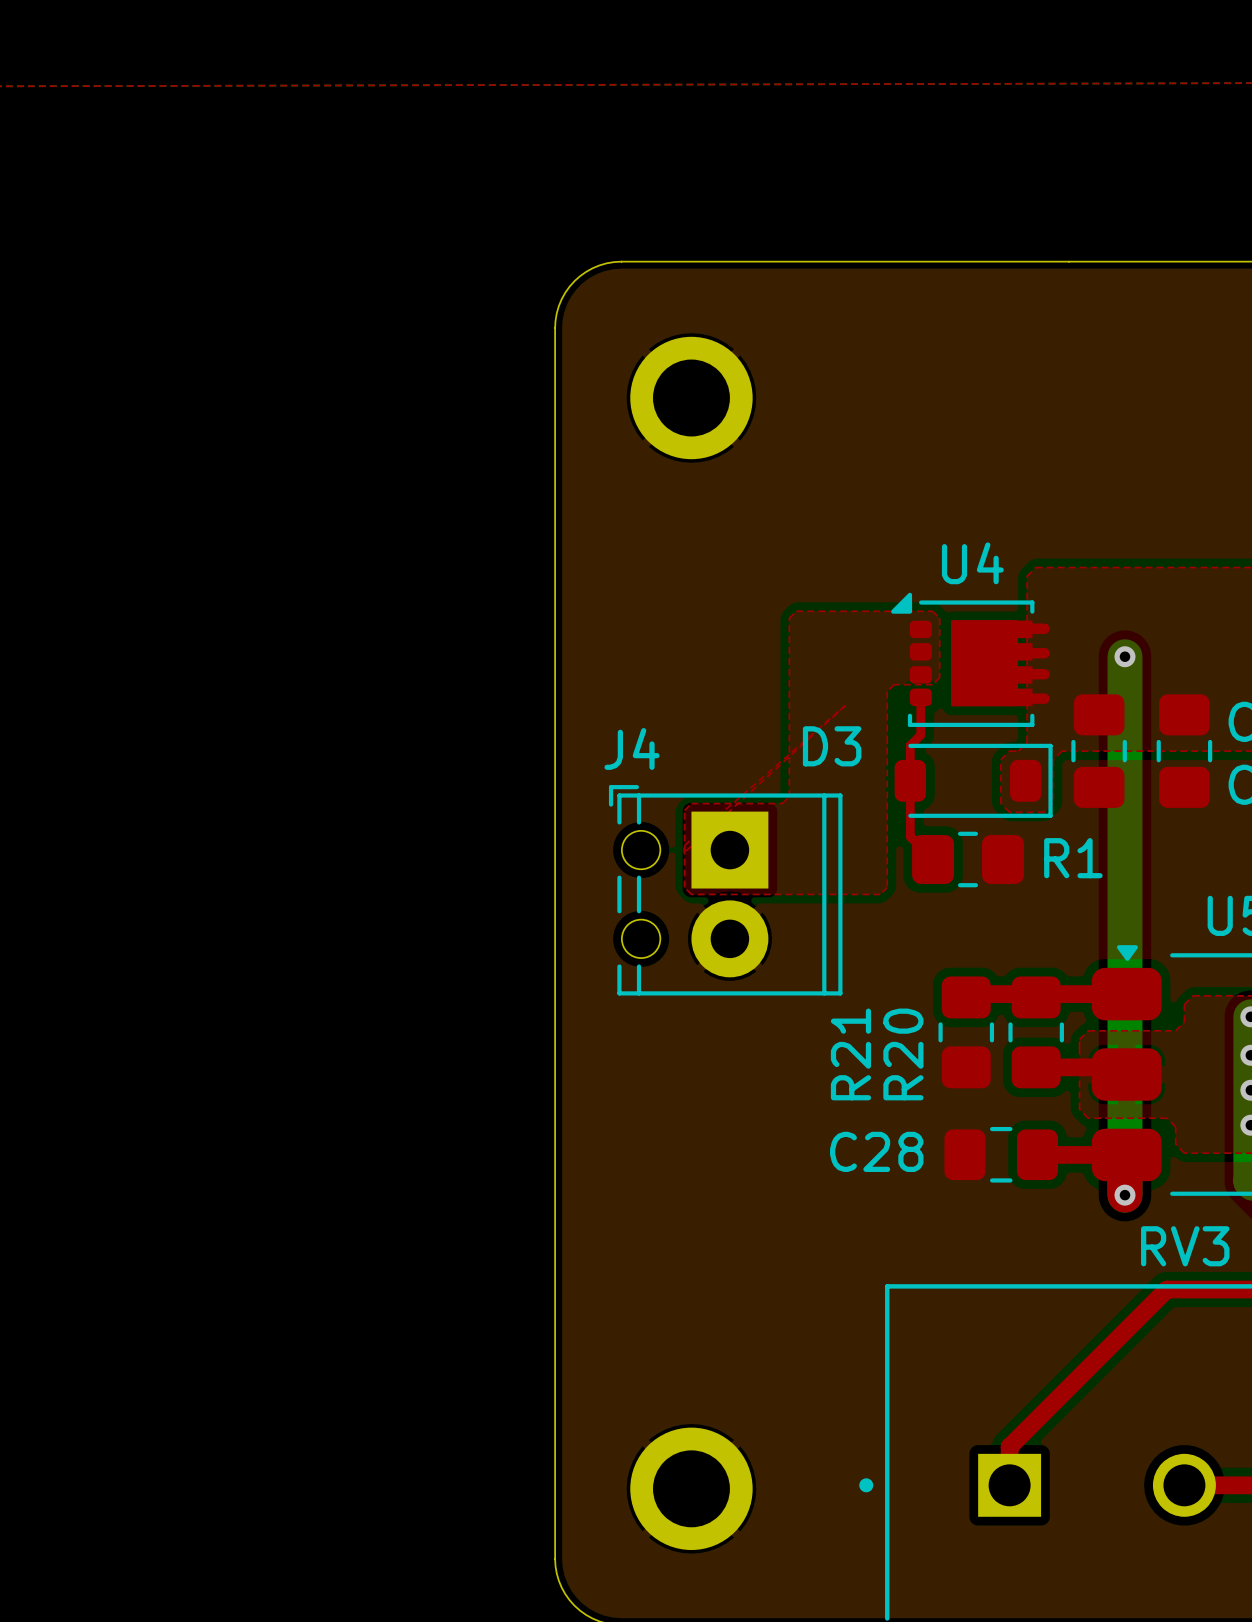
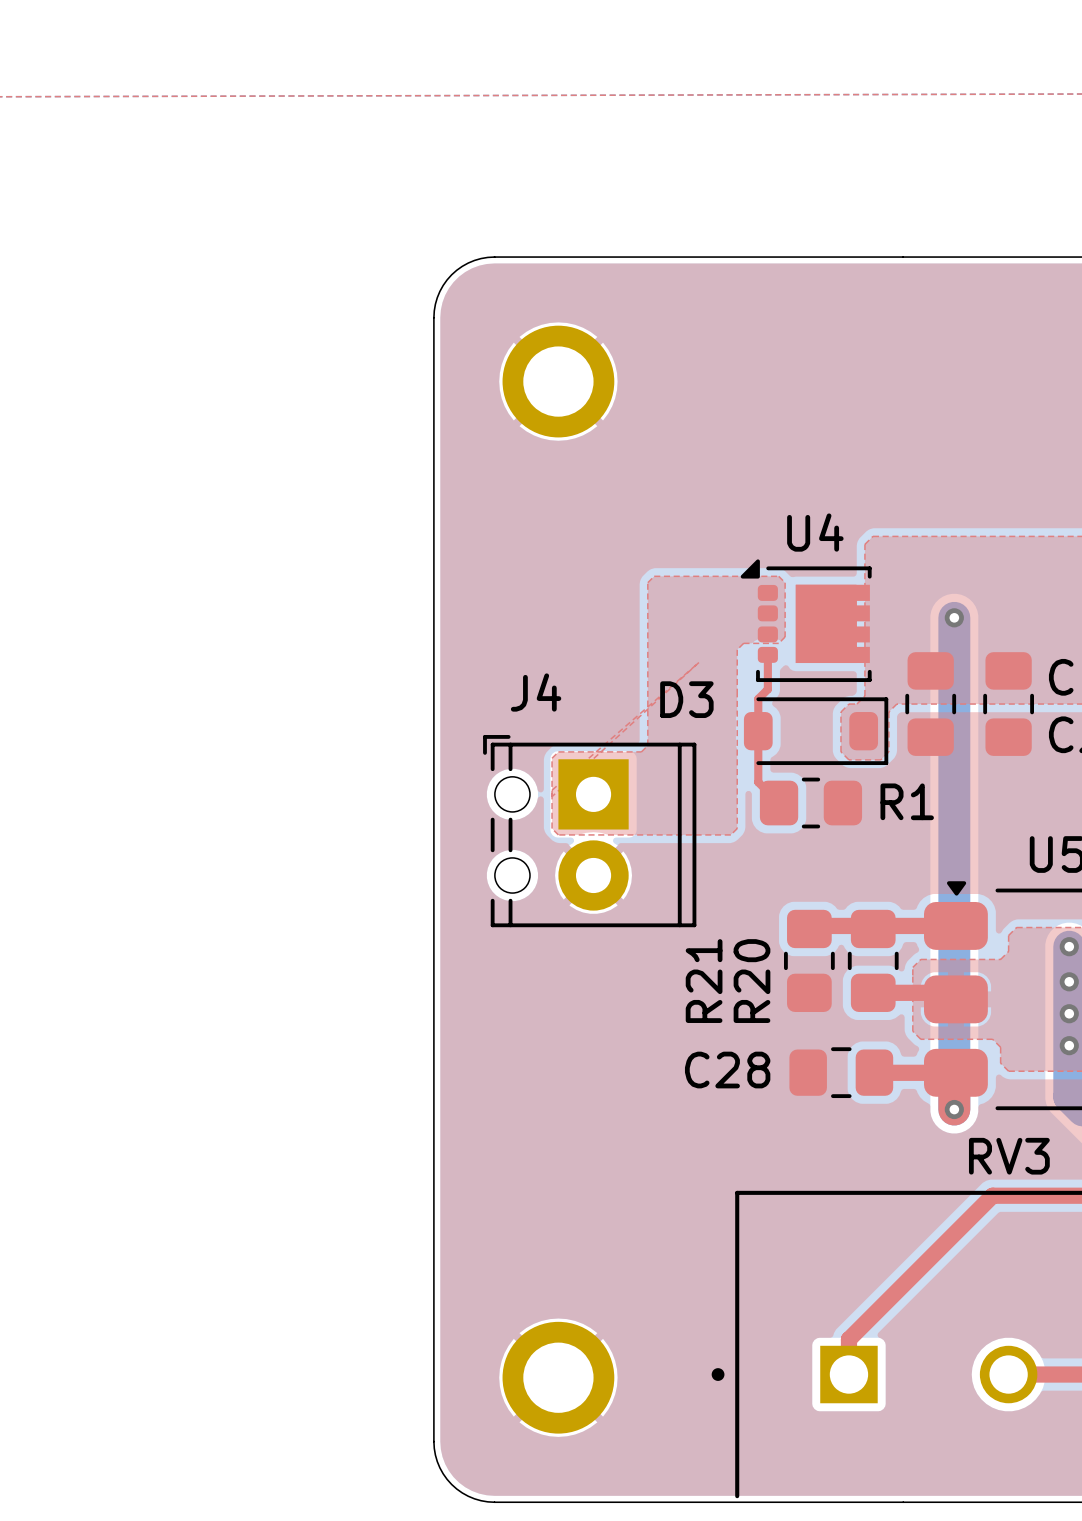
top track: (1016, 628) (1044, 628) -> none
top track: (1016, 653) (1044, 653) -> none
top track: (1016, 674) (1044, 674) -> none
top track: (1016, 698) (1044, 698) -> none
J4 name position: J4 (632, 748) -> J4 (536, 692)

